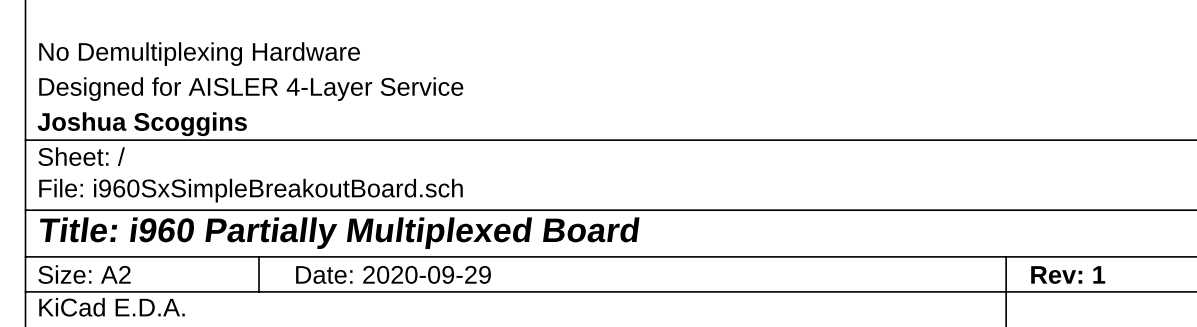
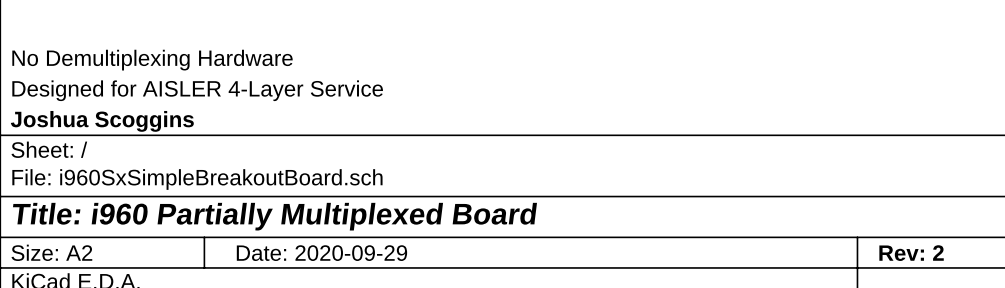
title block: Rev: 1 (1068, 275) -> Rev: 2 (911, 253)

